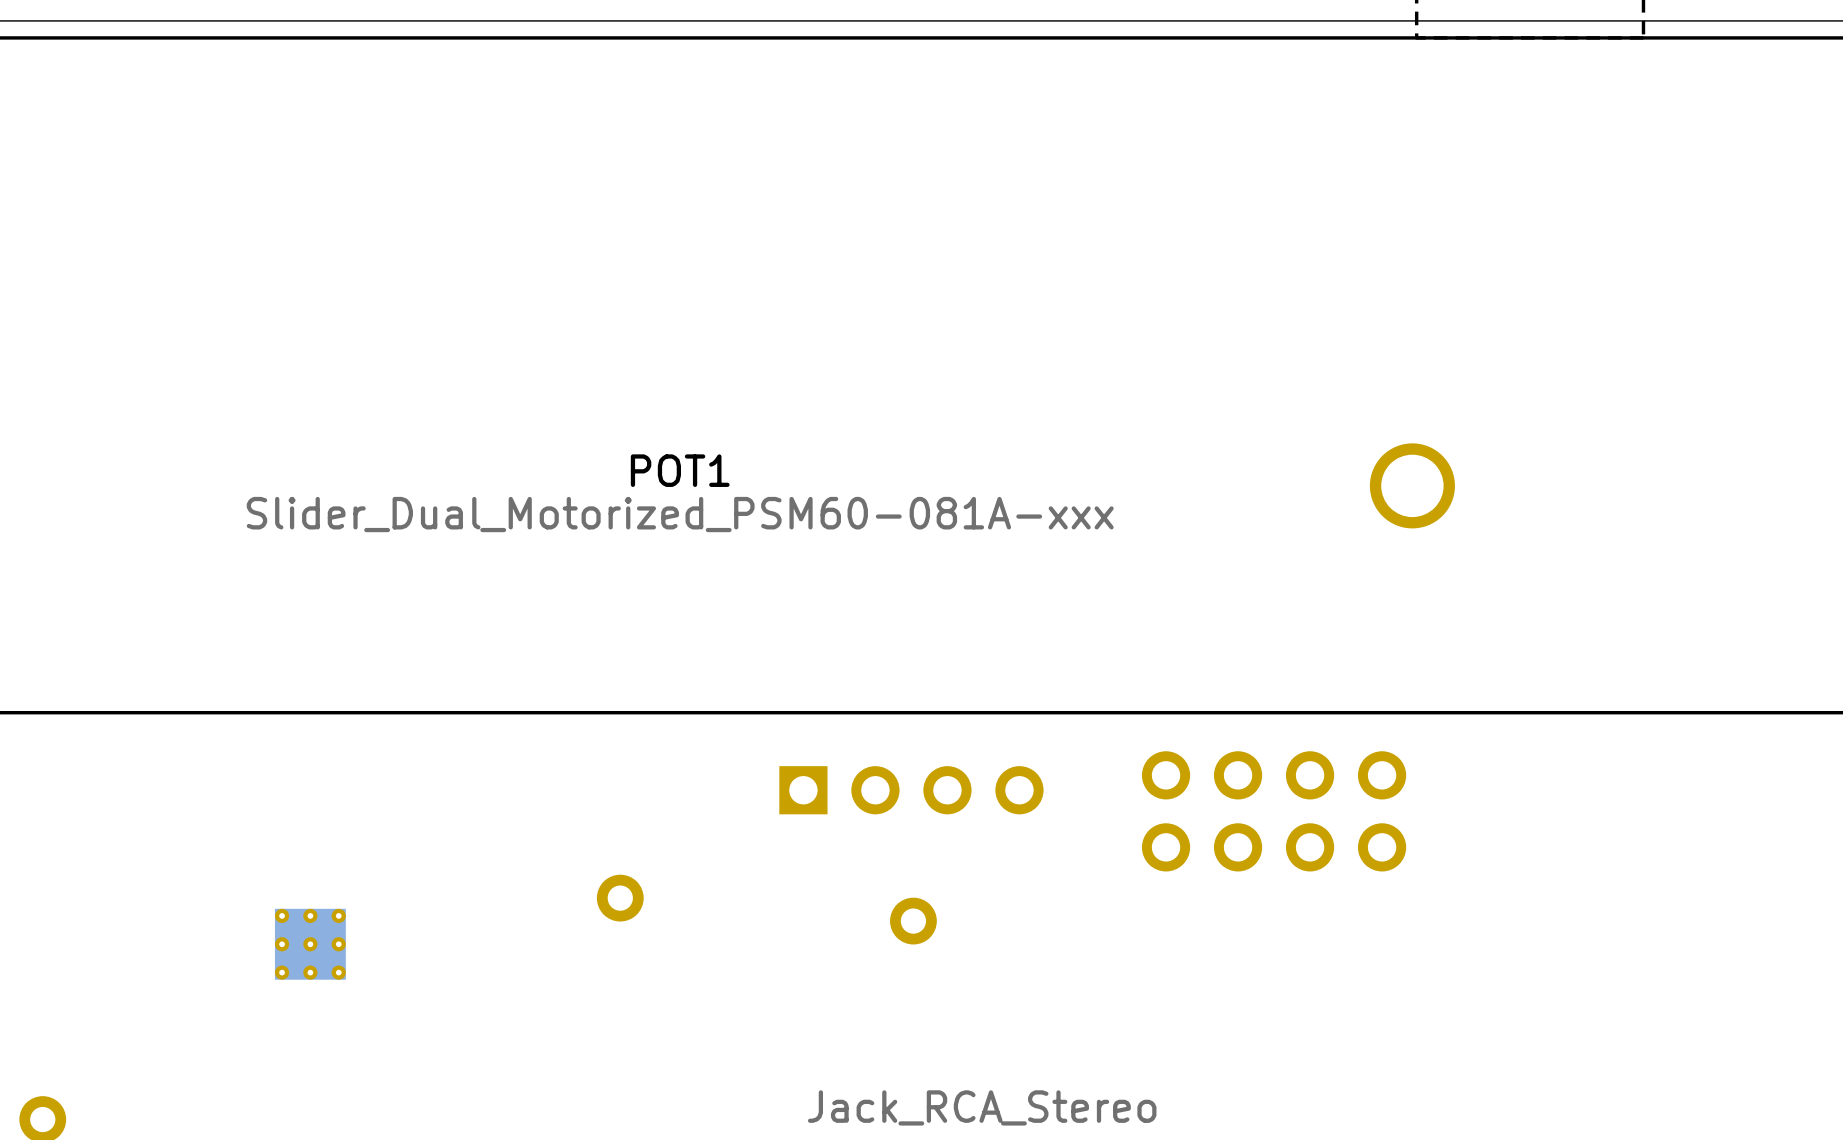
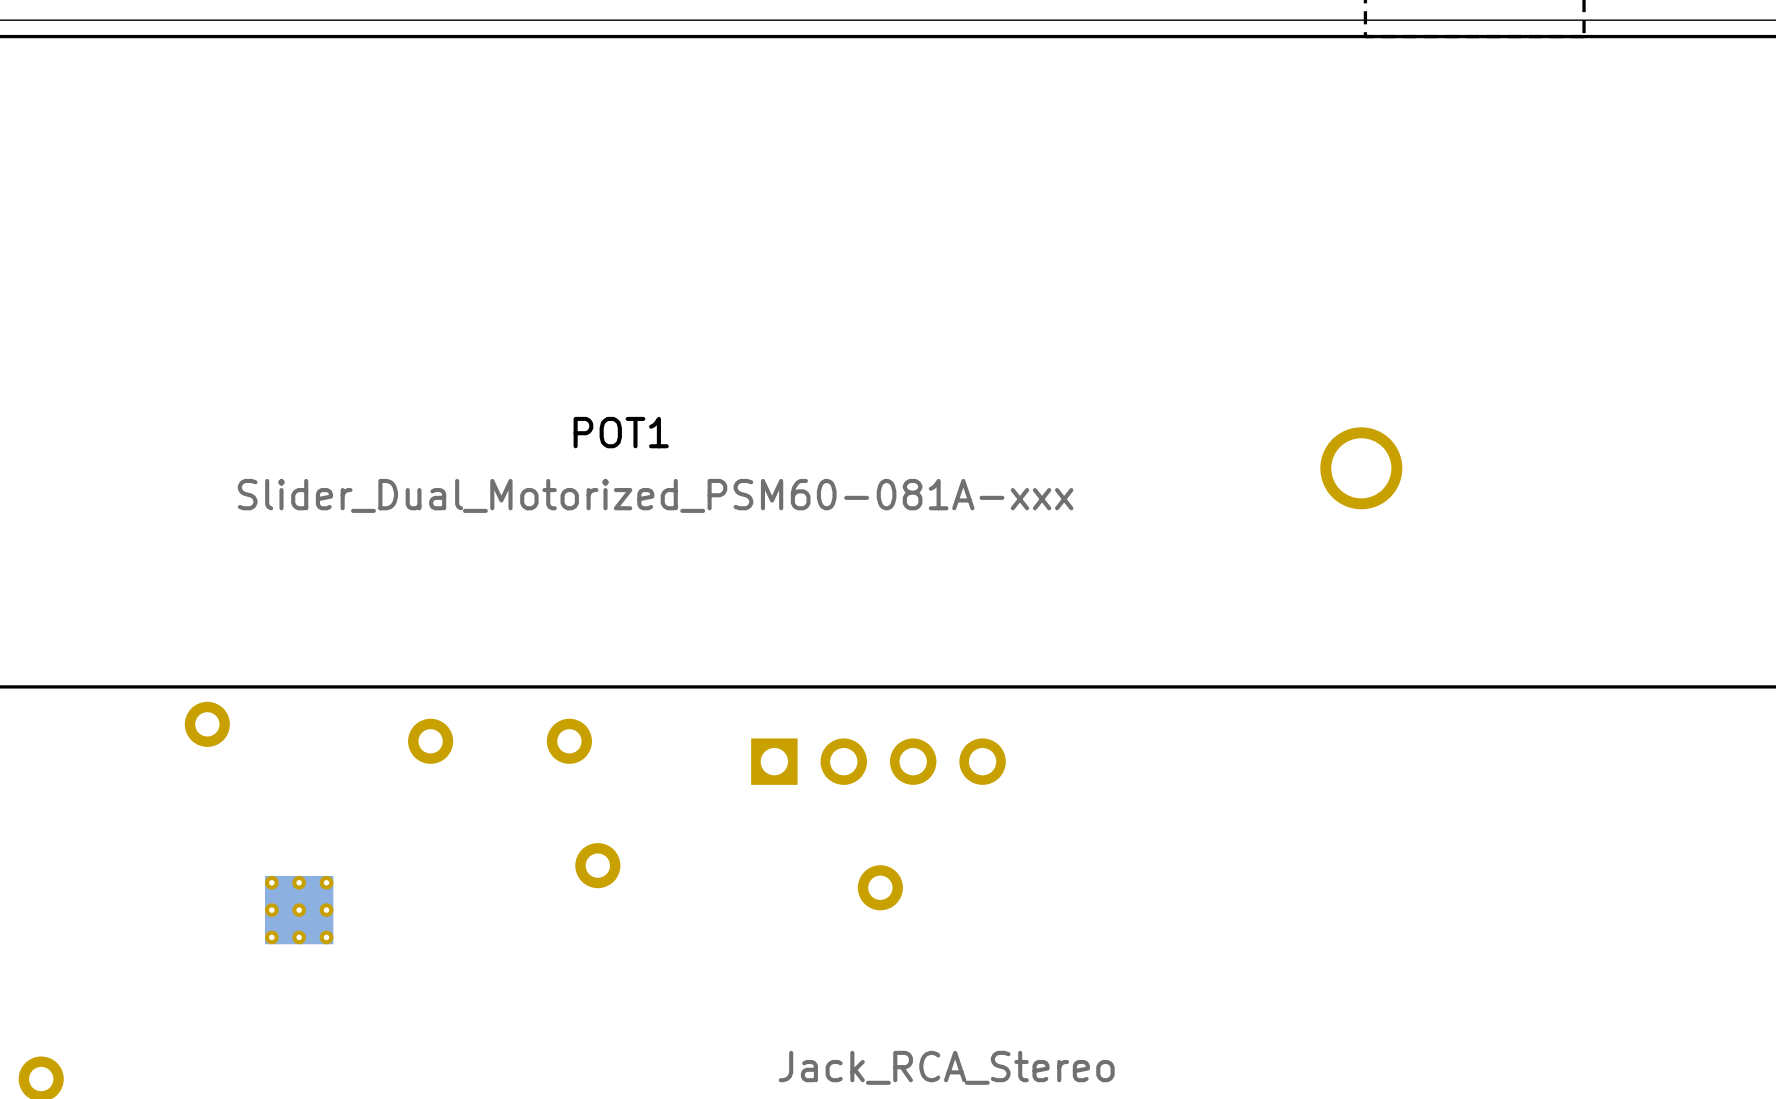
POT1 name position: POT1 (680, 470) -> POT1 (621, 432)
part: none -> (207, 724)
part: none -> (430, 741)
part: none -> (569, 741)
part: (1274, 811) -> none

